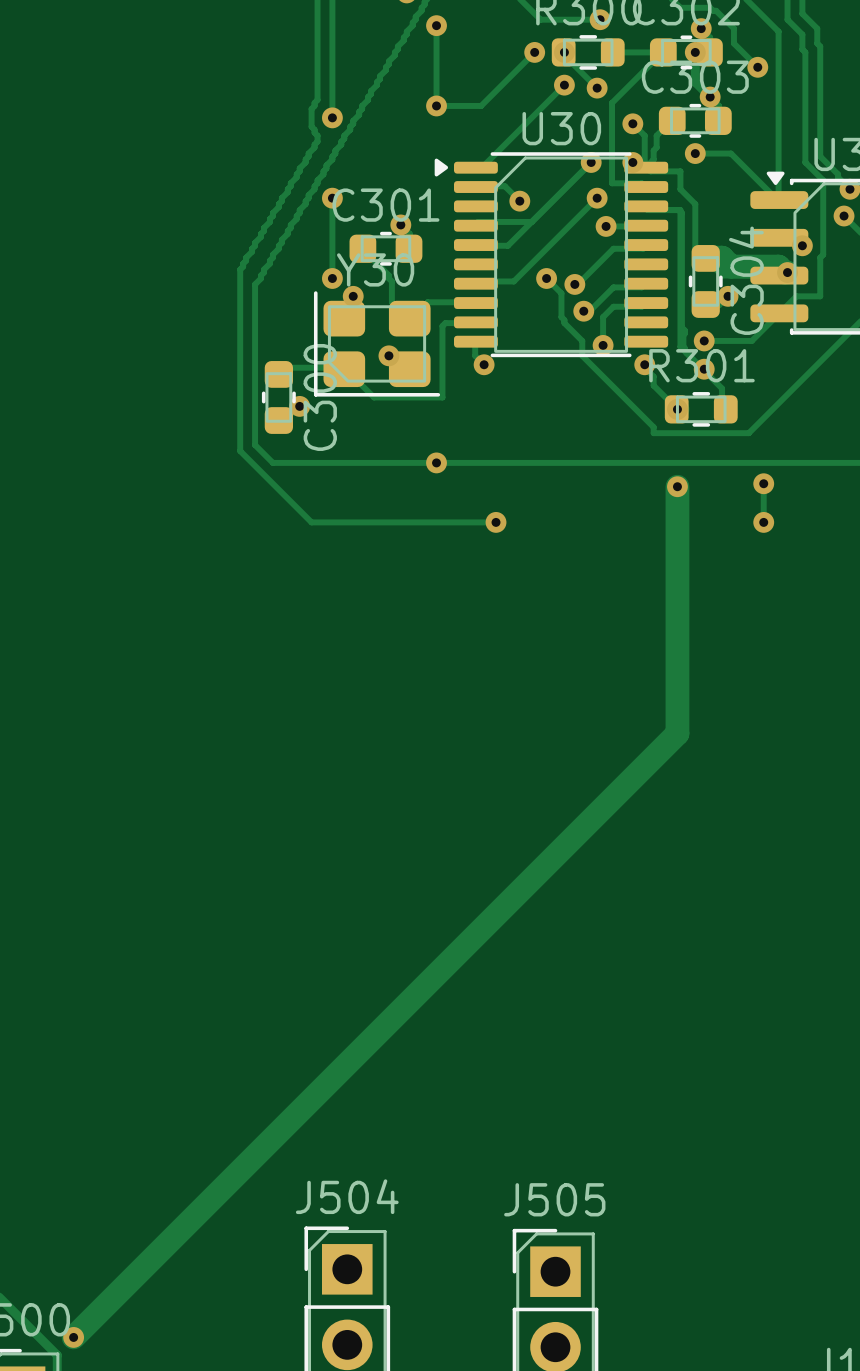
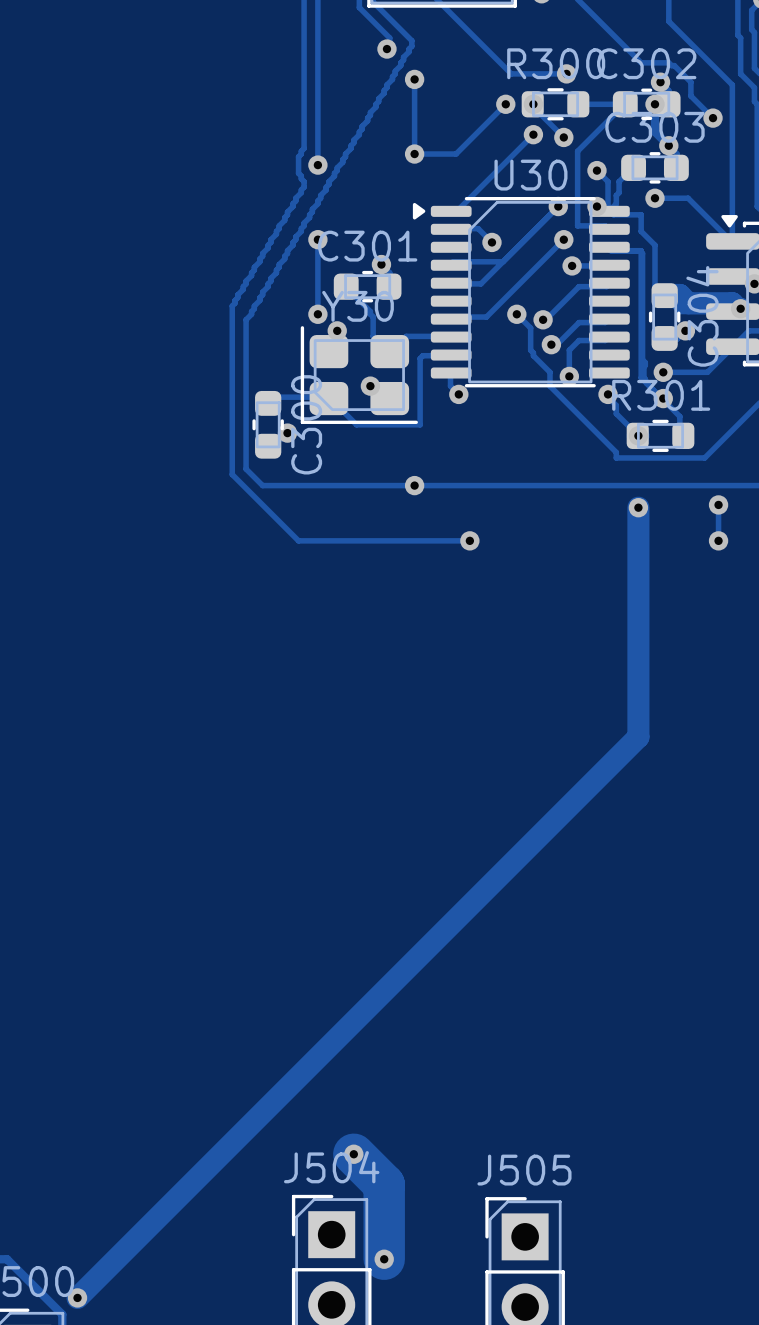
track: none -> (353, 1154) (384, 1184) (384, 1259)
via: none -> (353, 1154)
via: none -> (384, 1259)

